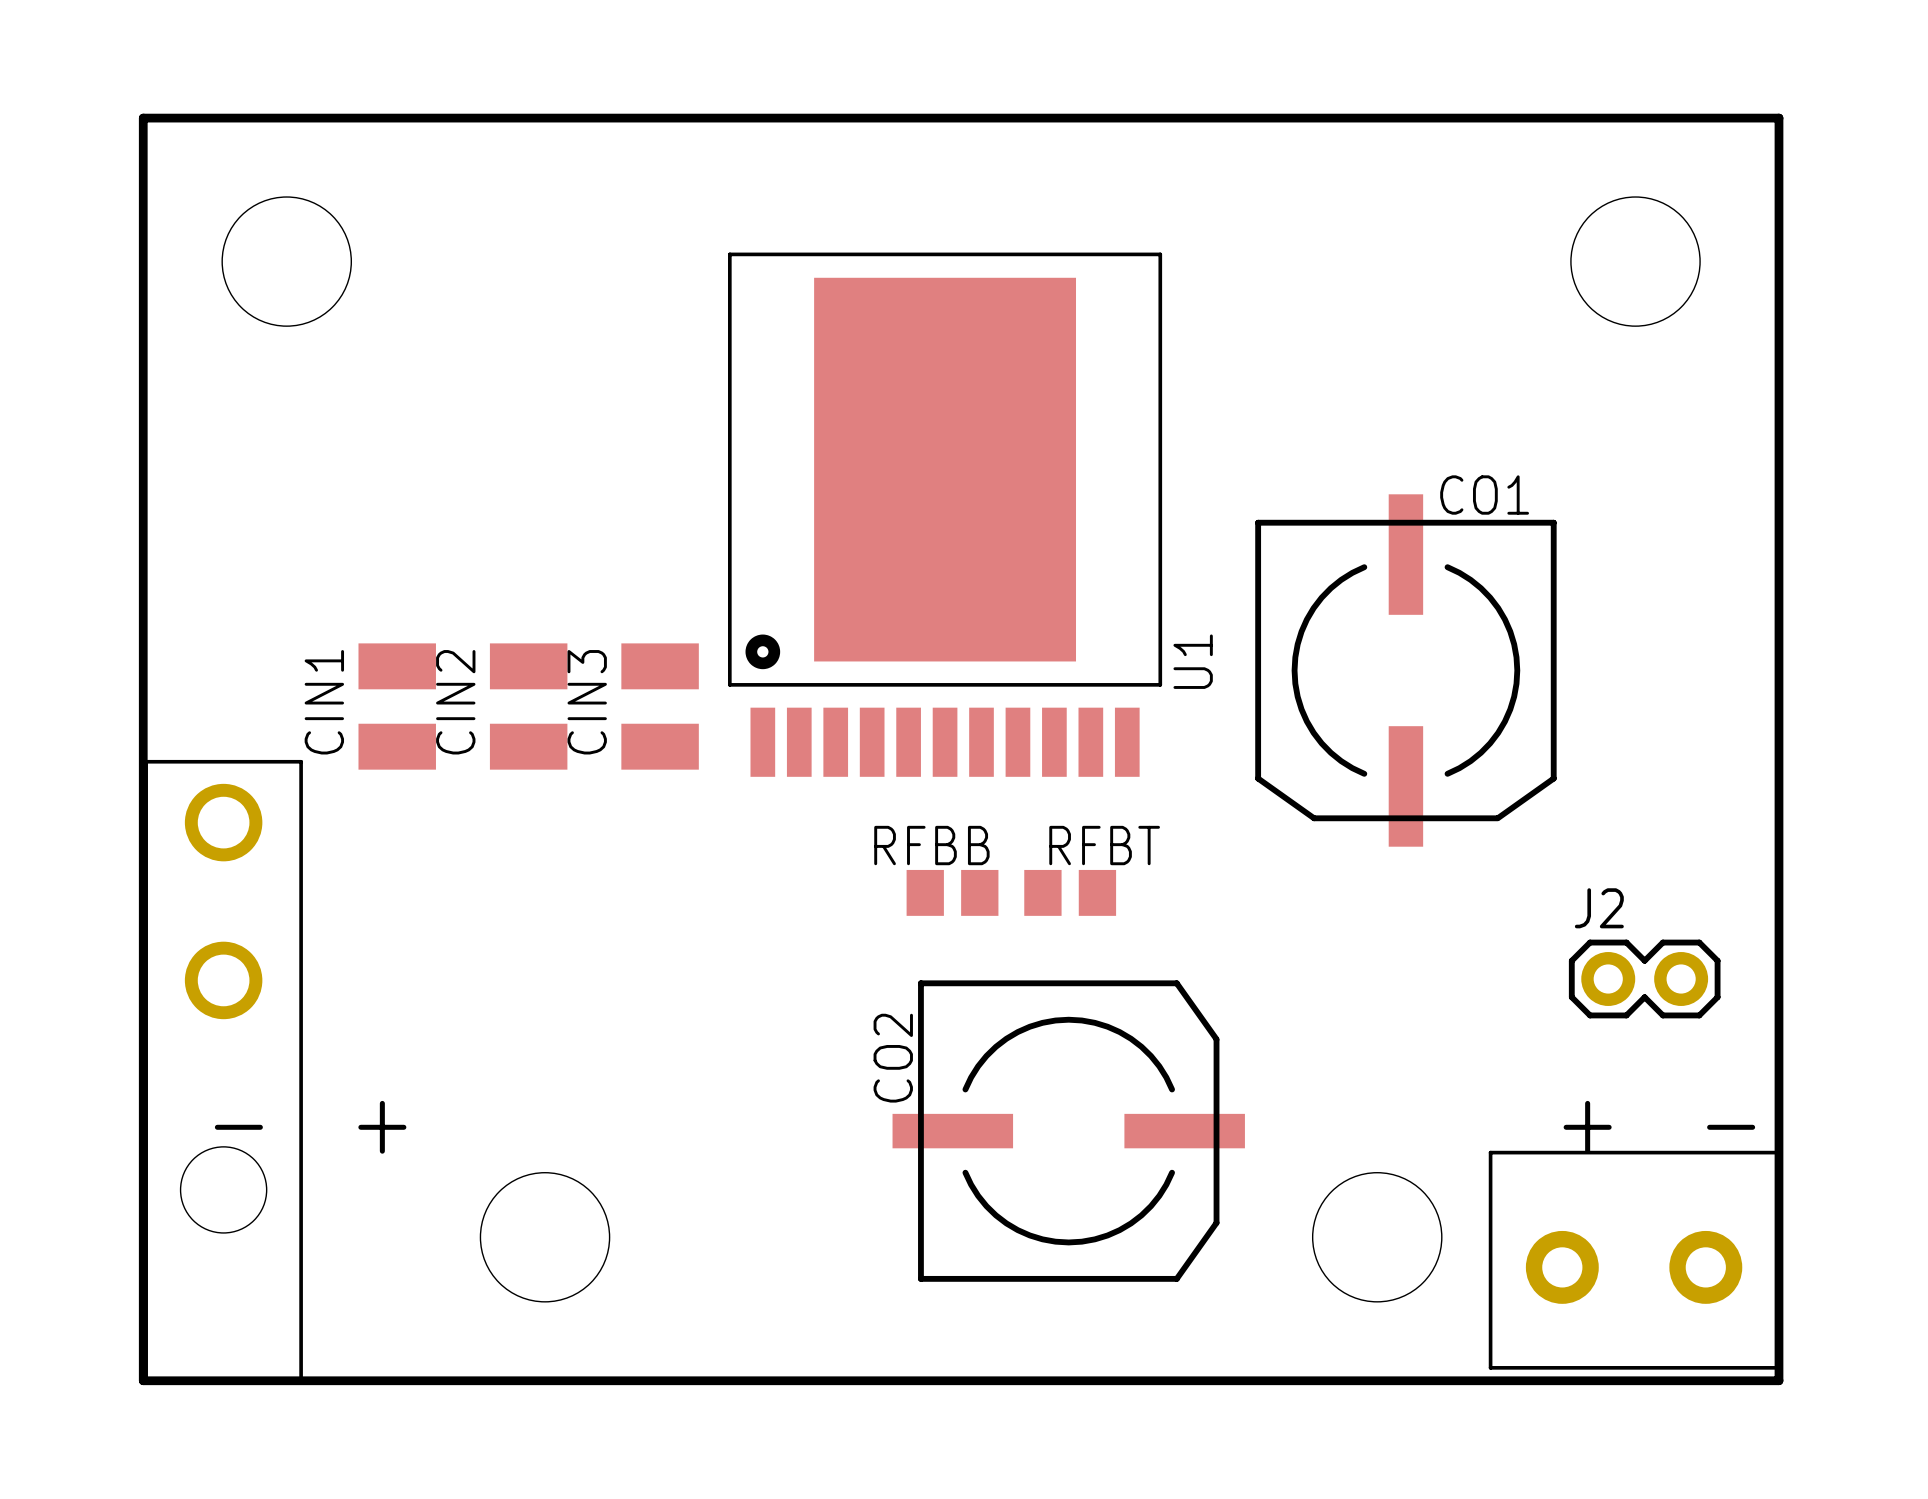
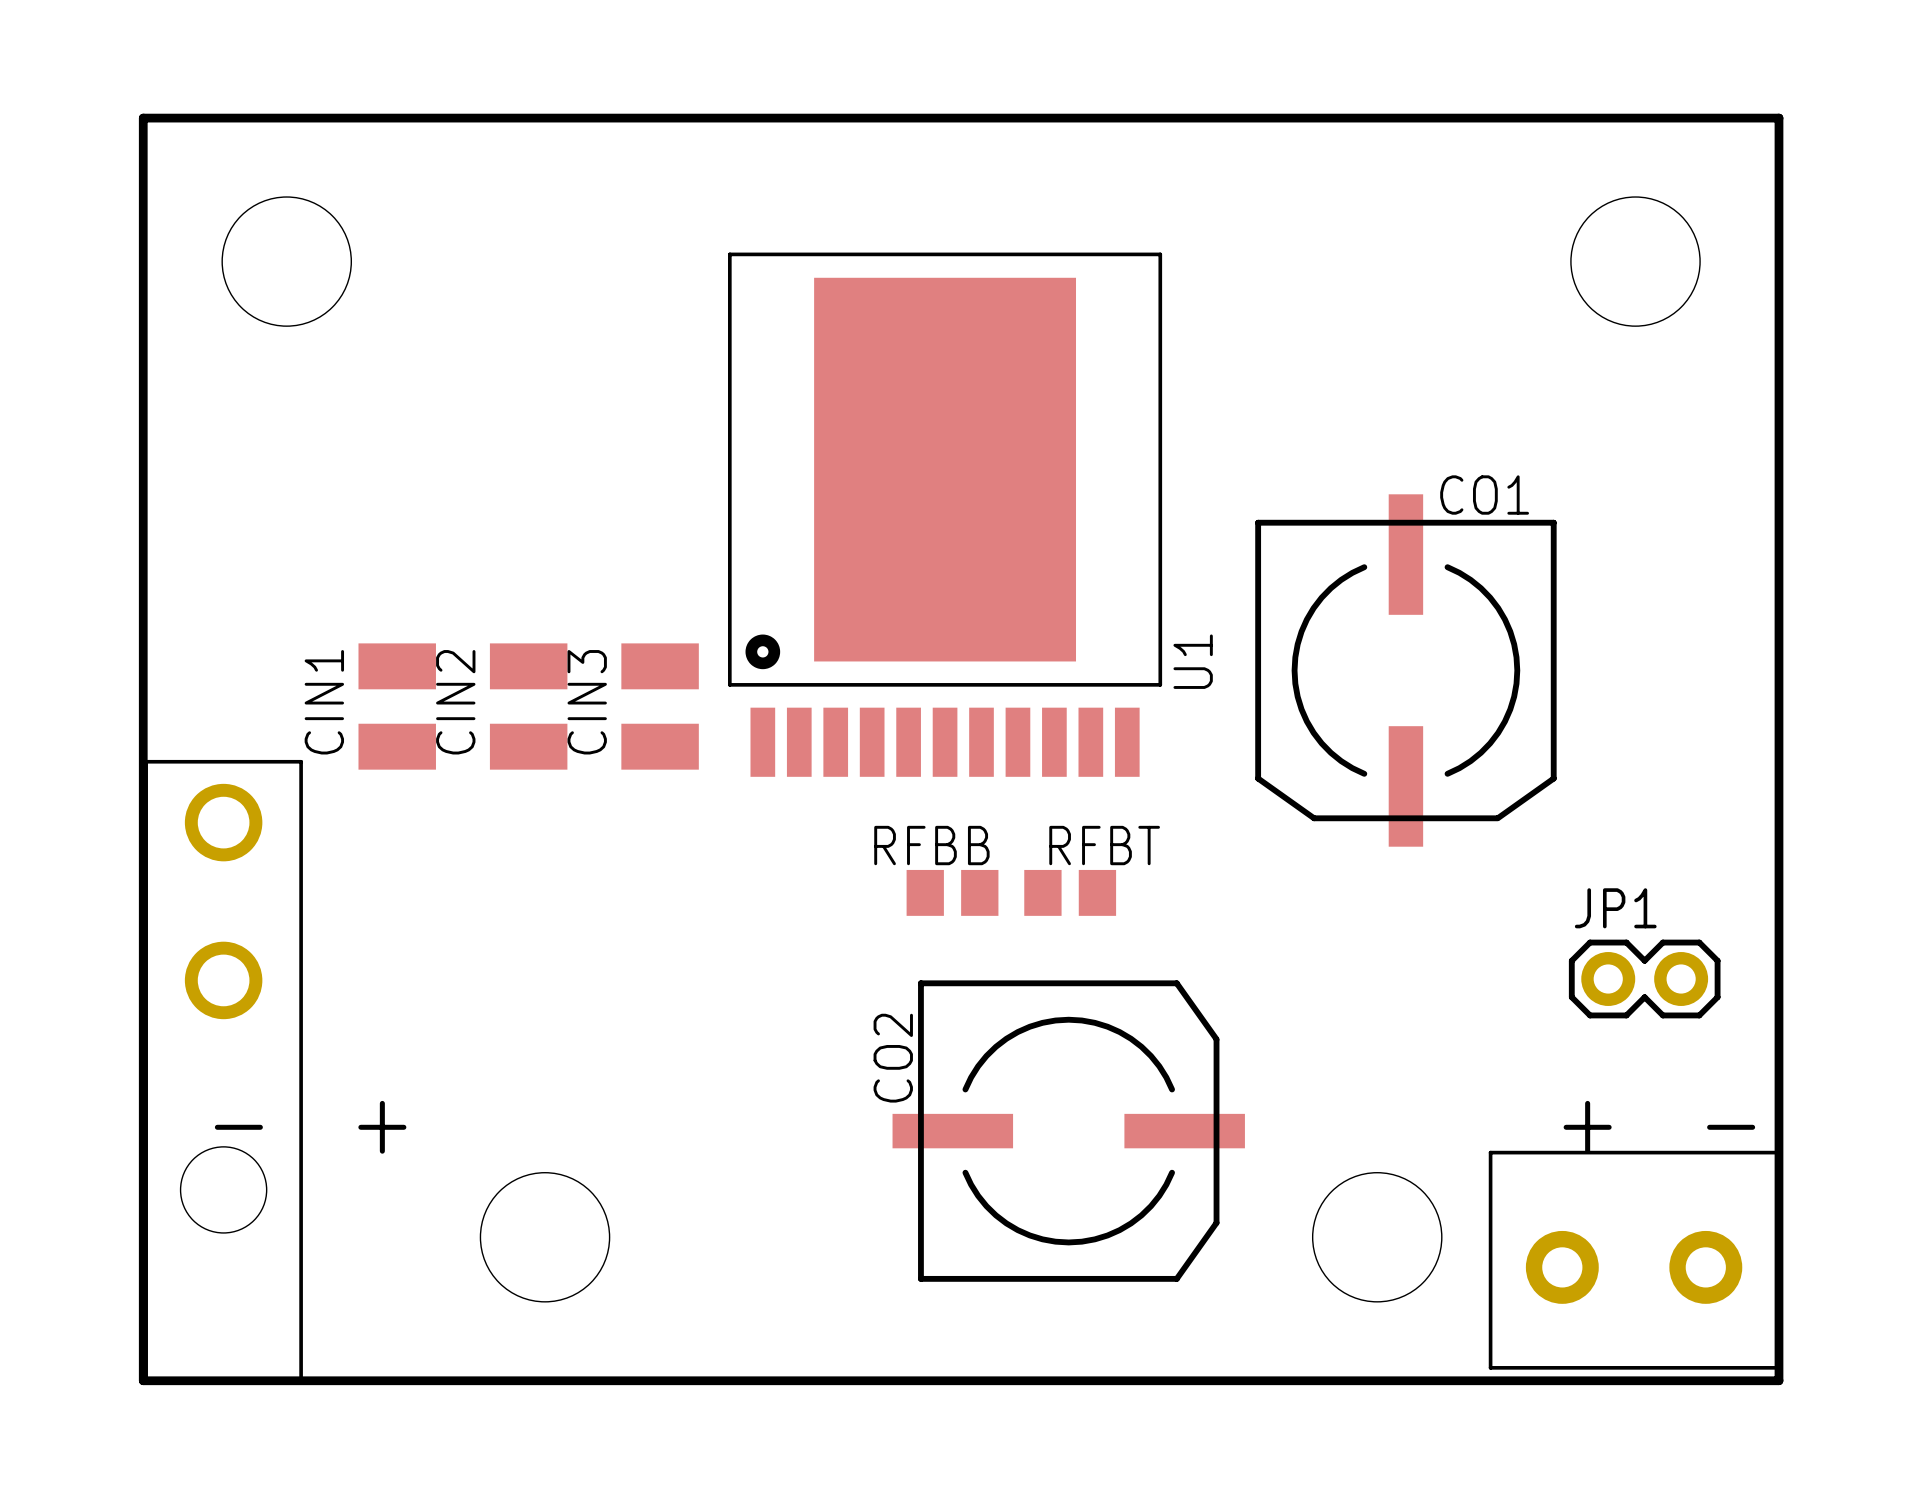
J2 name: J2 (1599, 908) -> JP1 (1615, 908)

